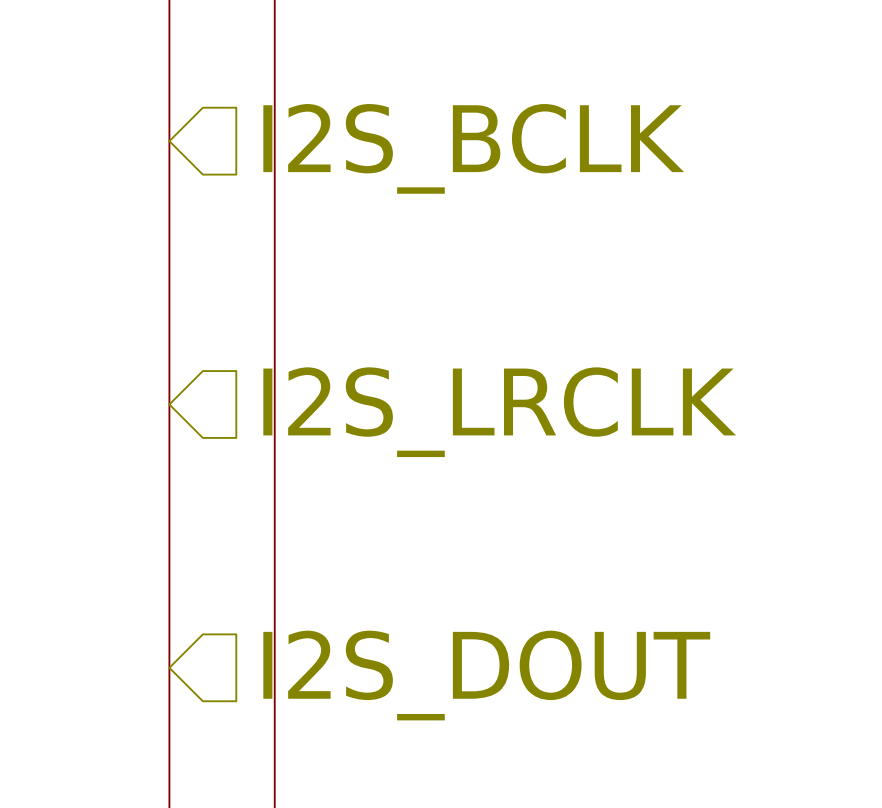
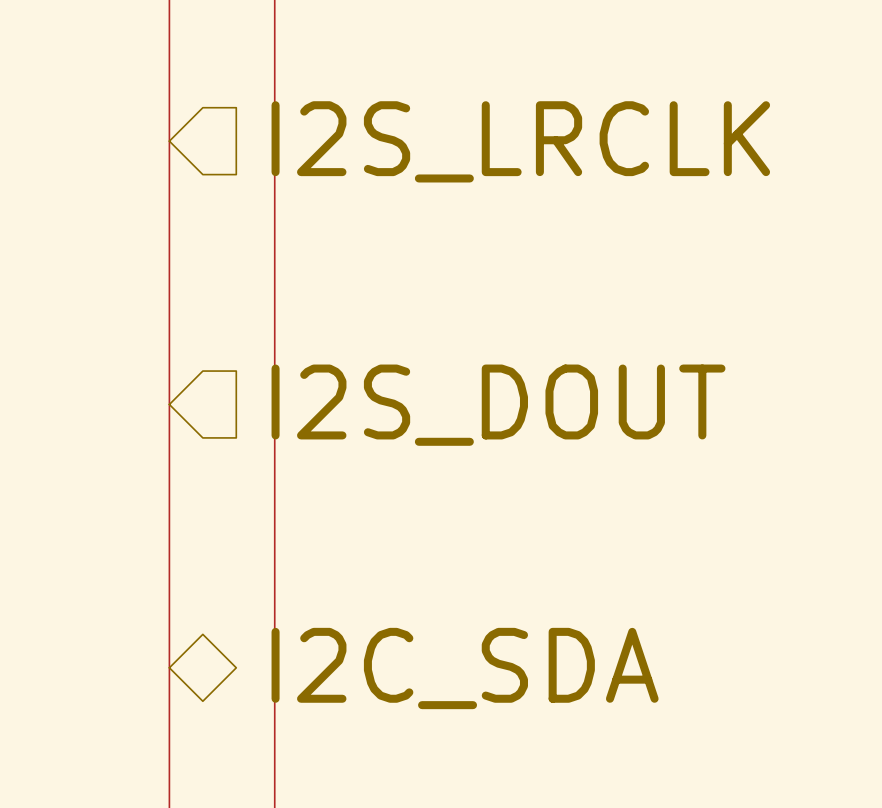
hierarchical label: I2S_BCLK (473, 148) -> I2S_LRCLK (520, 141)
hierarchical label: I2S_LRCLK (499, 412) -> I2S_DOUT (498, 405)
hierarchical label shape: input (486, 675) -> bidirectional (465, 668)
hierarchical label: I2S_DOUT (486, 675) -> I2C_SDA (465, 668)

